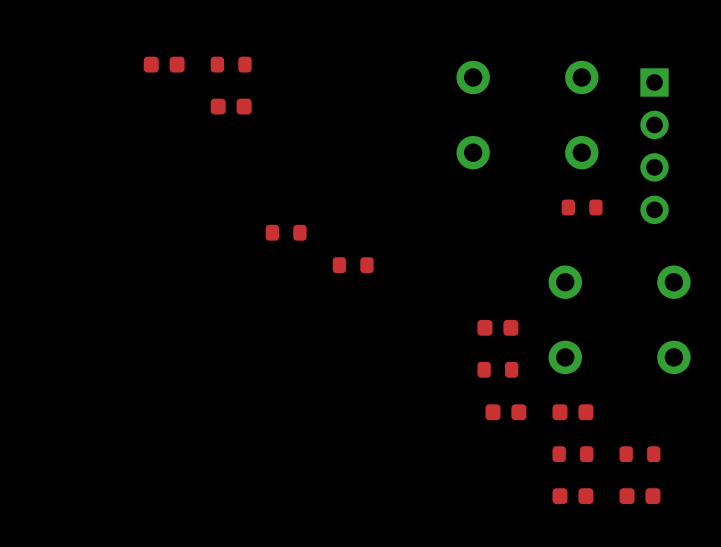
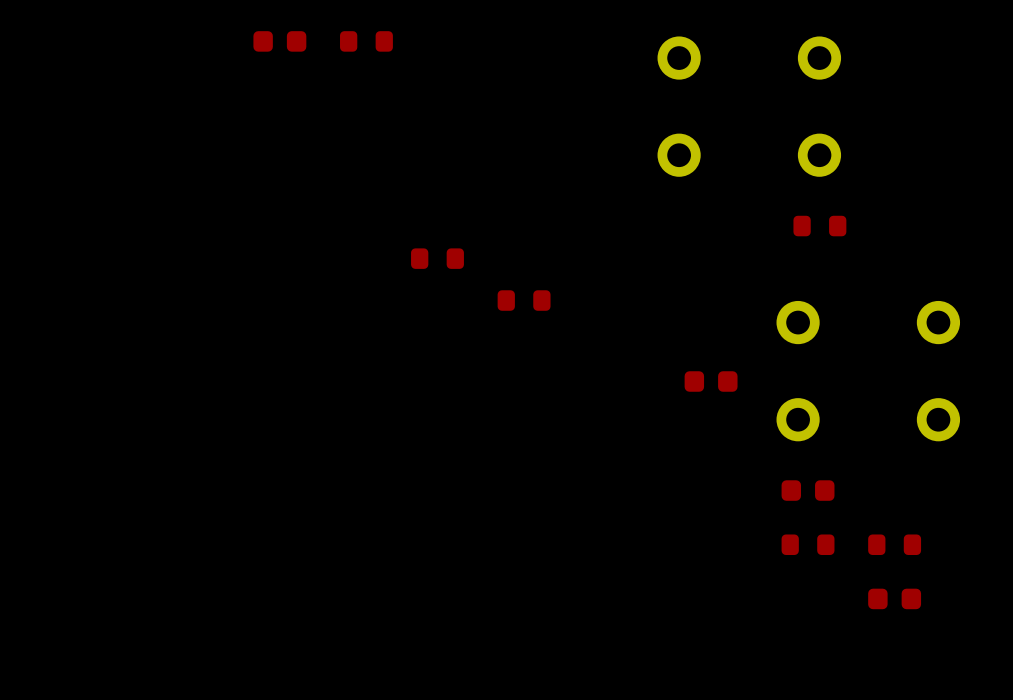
part: (231, 106) -> none
part: (654, 146) -> none
part: (497, 369) -> none
part: (505, 412) -> none
part: (572, 496) -> none

